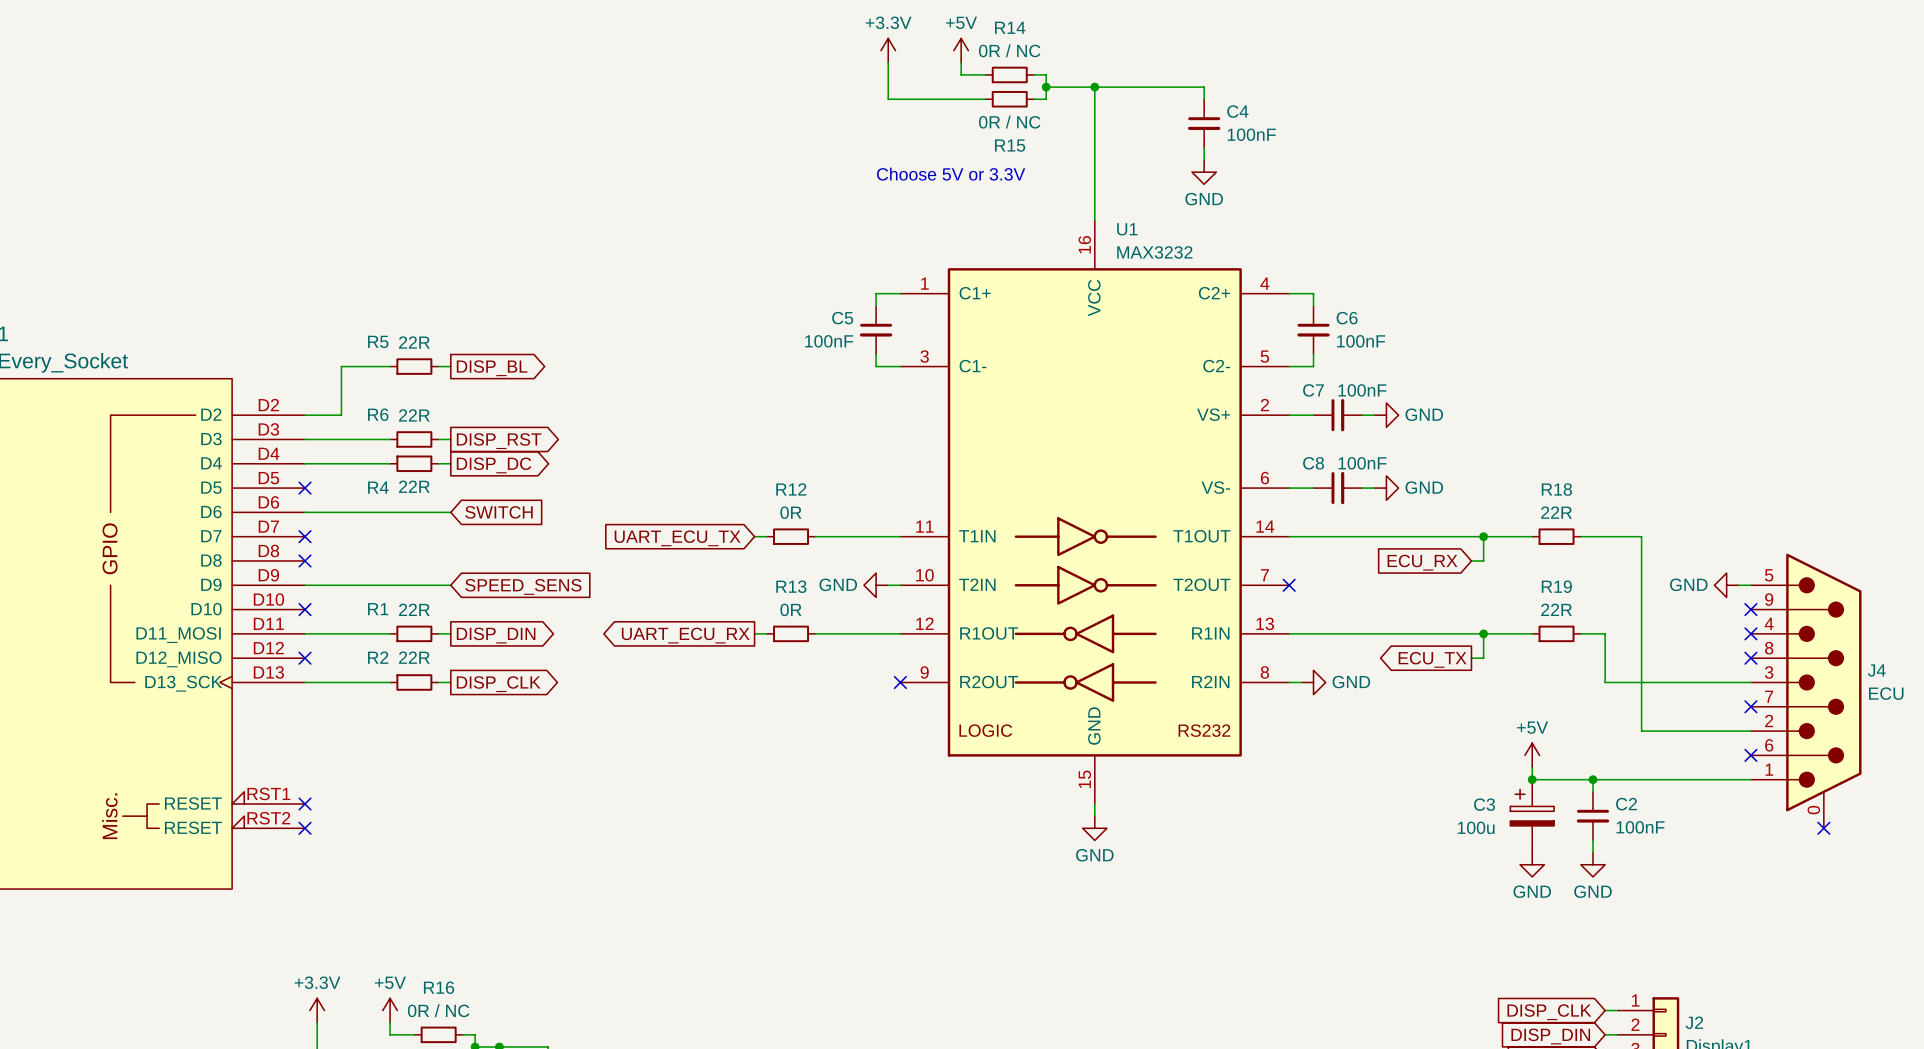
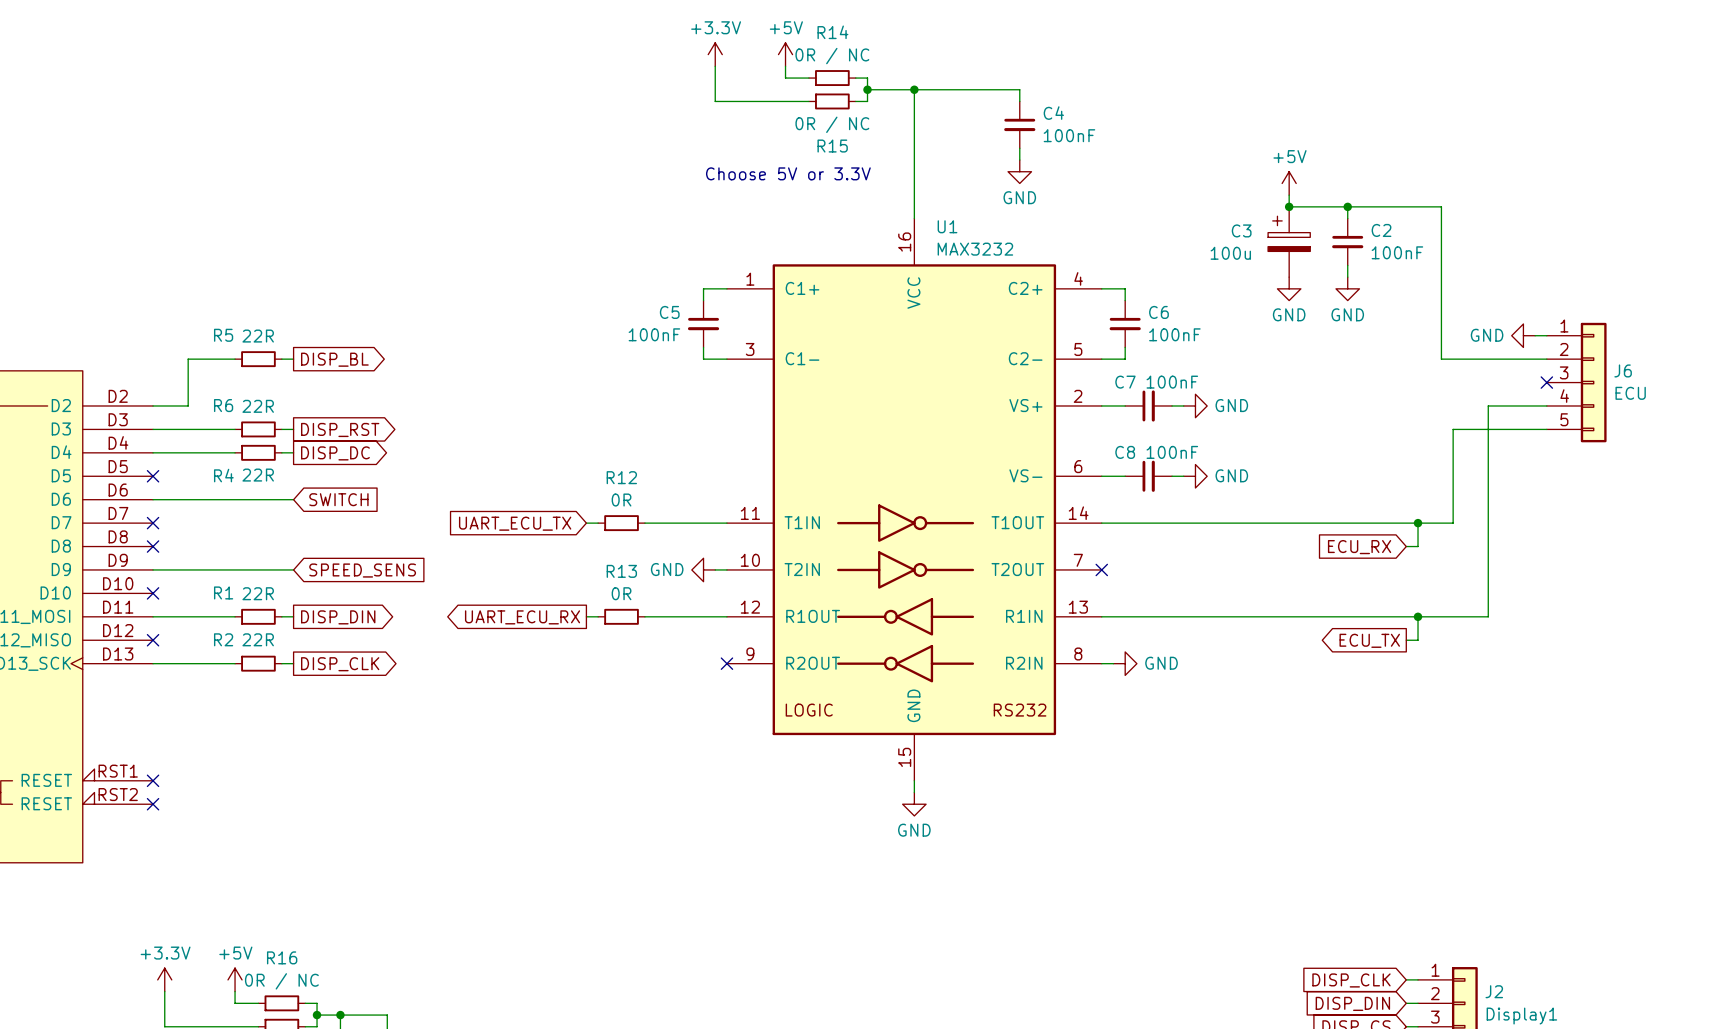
power symbol: none -> +5V (1289, 183)
wire: none -> (1289, 195) (1289, 206) (1441, 206) (1441, 359) (1546, 359)
junction: none -> (1289, 206)
wire: none -> (1347, 206) (1347, 218)
junction: none -> (1347, 206)
wire: none -> (1347, 265) (1347, 277)
power symbol: none -> GND (1289, 288)
power symbol: none -> GND (1347, 288)
power symbol: none -> GND (1523, 335)
wire: none -> (1535, 335) (1546, 335)
no-connect mark: none -> (1546, 382)
J6: none -> ECU (1576, 382)
wire: (1483, 536) (1483, 560) (1471, 560) -> (1418, 523) (1418, 546) (1406, 546)
junction: (1483, 536) -> none
wire: none -> (1336, 523) (1382, 523)
R18: 22R (1556, 536) -> none
junction: none -> (1418, 523)
wire: (1641, 536) (1641, 731) (1750, 731) -> (1441, 523) (1453, 523) (1453, 429) (1546, 429)
global label position: ECU_RX (1422, 562) -> ECU_RX (1359, 547)
power symbol: GND (1726, 585) -> none
wire: (1738, 585) (1750, 585) -> none
no-connect mark: (1750, 609) -> none
wire: (1483, 633) (1483, 658) (1471, 658) -> (1418, 616) (1418, 640) (1406, 640)
junction: (1483, 633) -> none
wire: none -> (1336, 616) (1382, 616)
R19: 22R (1556, 633) -> none
wire: (1605, 633) (1605, 682) (1750, 682) -> (1406, 616) (1488, 616) (1488, 405) (1546, 405)
junction: none -> (1418, 616)
no-connect mark: (1750, 633) -> none
no-connect mark: (1750, 658) -> none
global label position: ECU_TX (1432, 659) -> ECU_TX (1369, 640)
J4: ECU (1806, 690) -> none
no-connect mark: (1750, 706) -> none
power symbol: +5V (1532, 755) -> none
no-connect mark: (1750, 755) -> none
wire: (1532, 767) (1532, 779) (1750, 779) -> none
junction: (1532, 779) -> none
wire: (1592, 779) (1592, 791) -> none
junction: (1592, 779) -> none
C3 position: (1532, 816) -> (1289, 242)
C2 position: (1592, 816) -> (1347, 242)
no-connect mark: (1823, 828) -> none
wire: (1592, 840) (1592, 852) -> none
power symbol: GND (1532, 864) -> none
power symbol: GND (1592, 864) -> none

